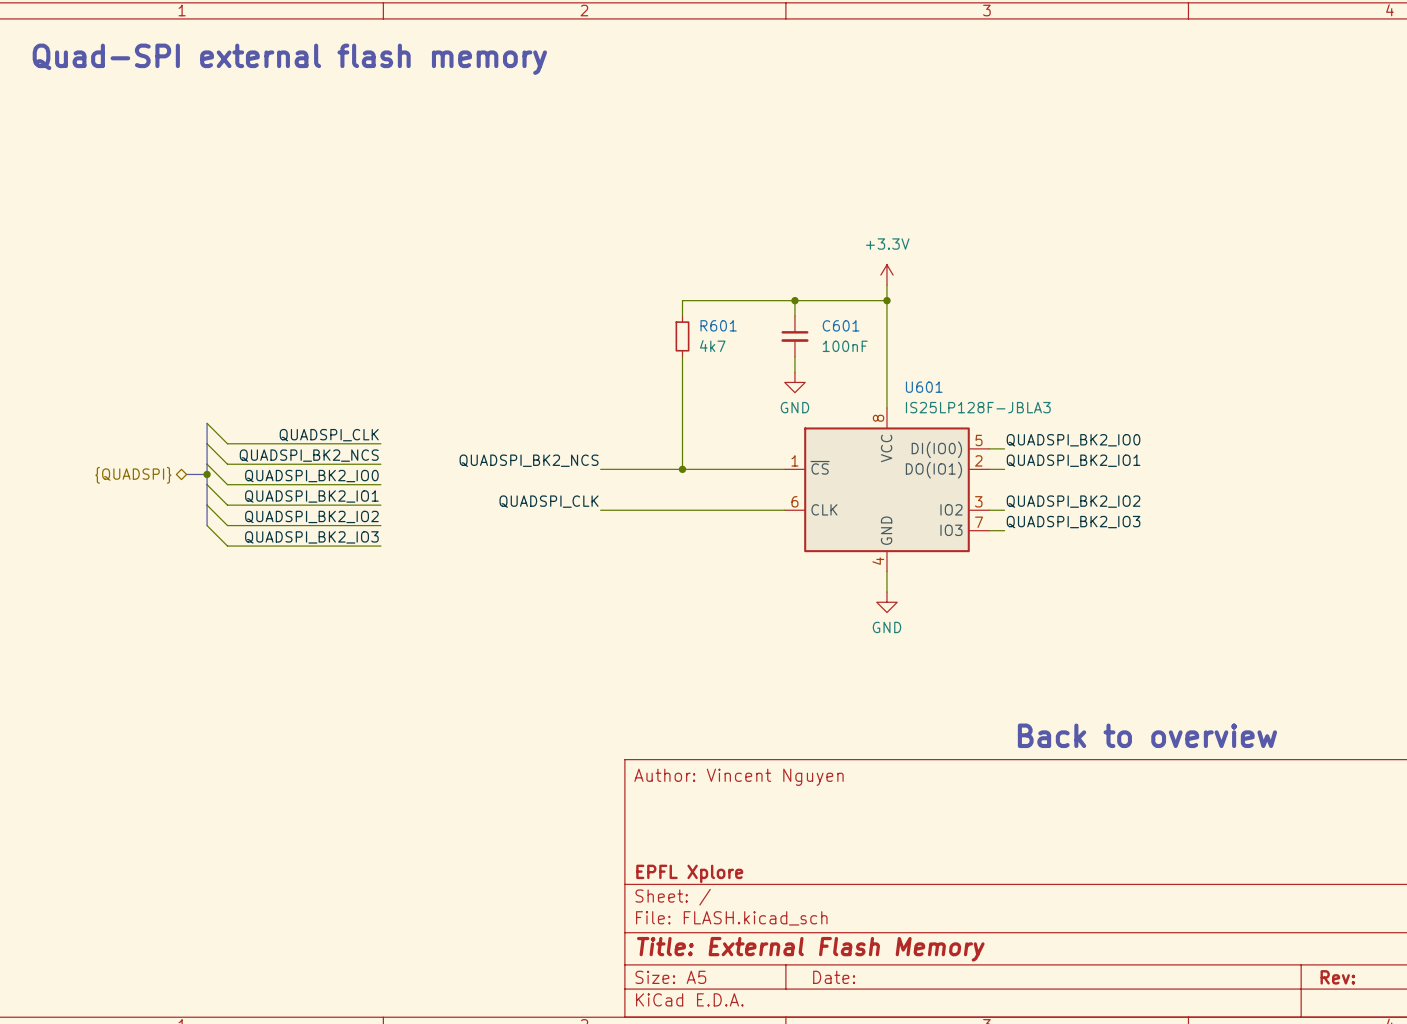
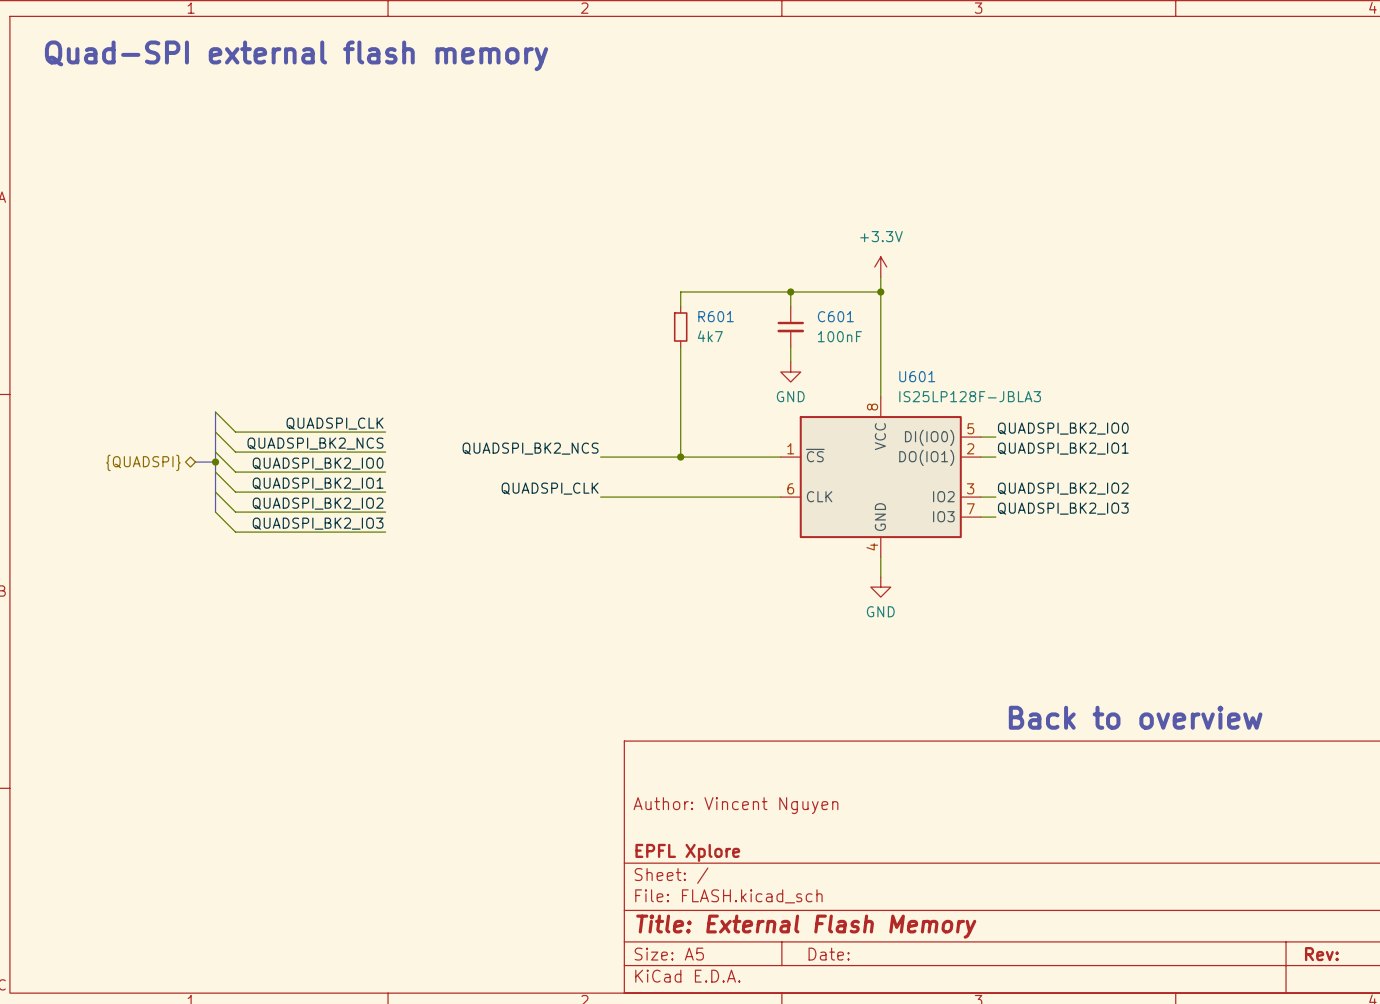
title block position: Author: Vincent Nguyen (738, 777) -> Author: Vincent Nguyen (735, 805)

